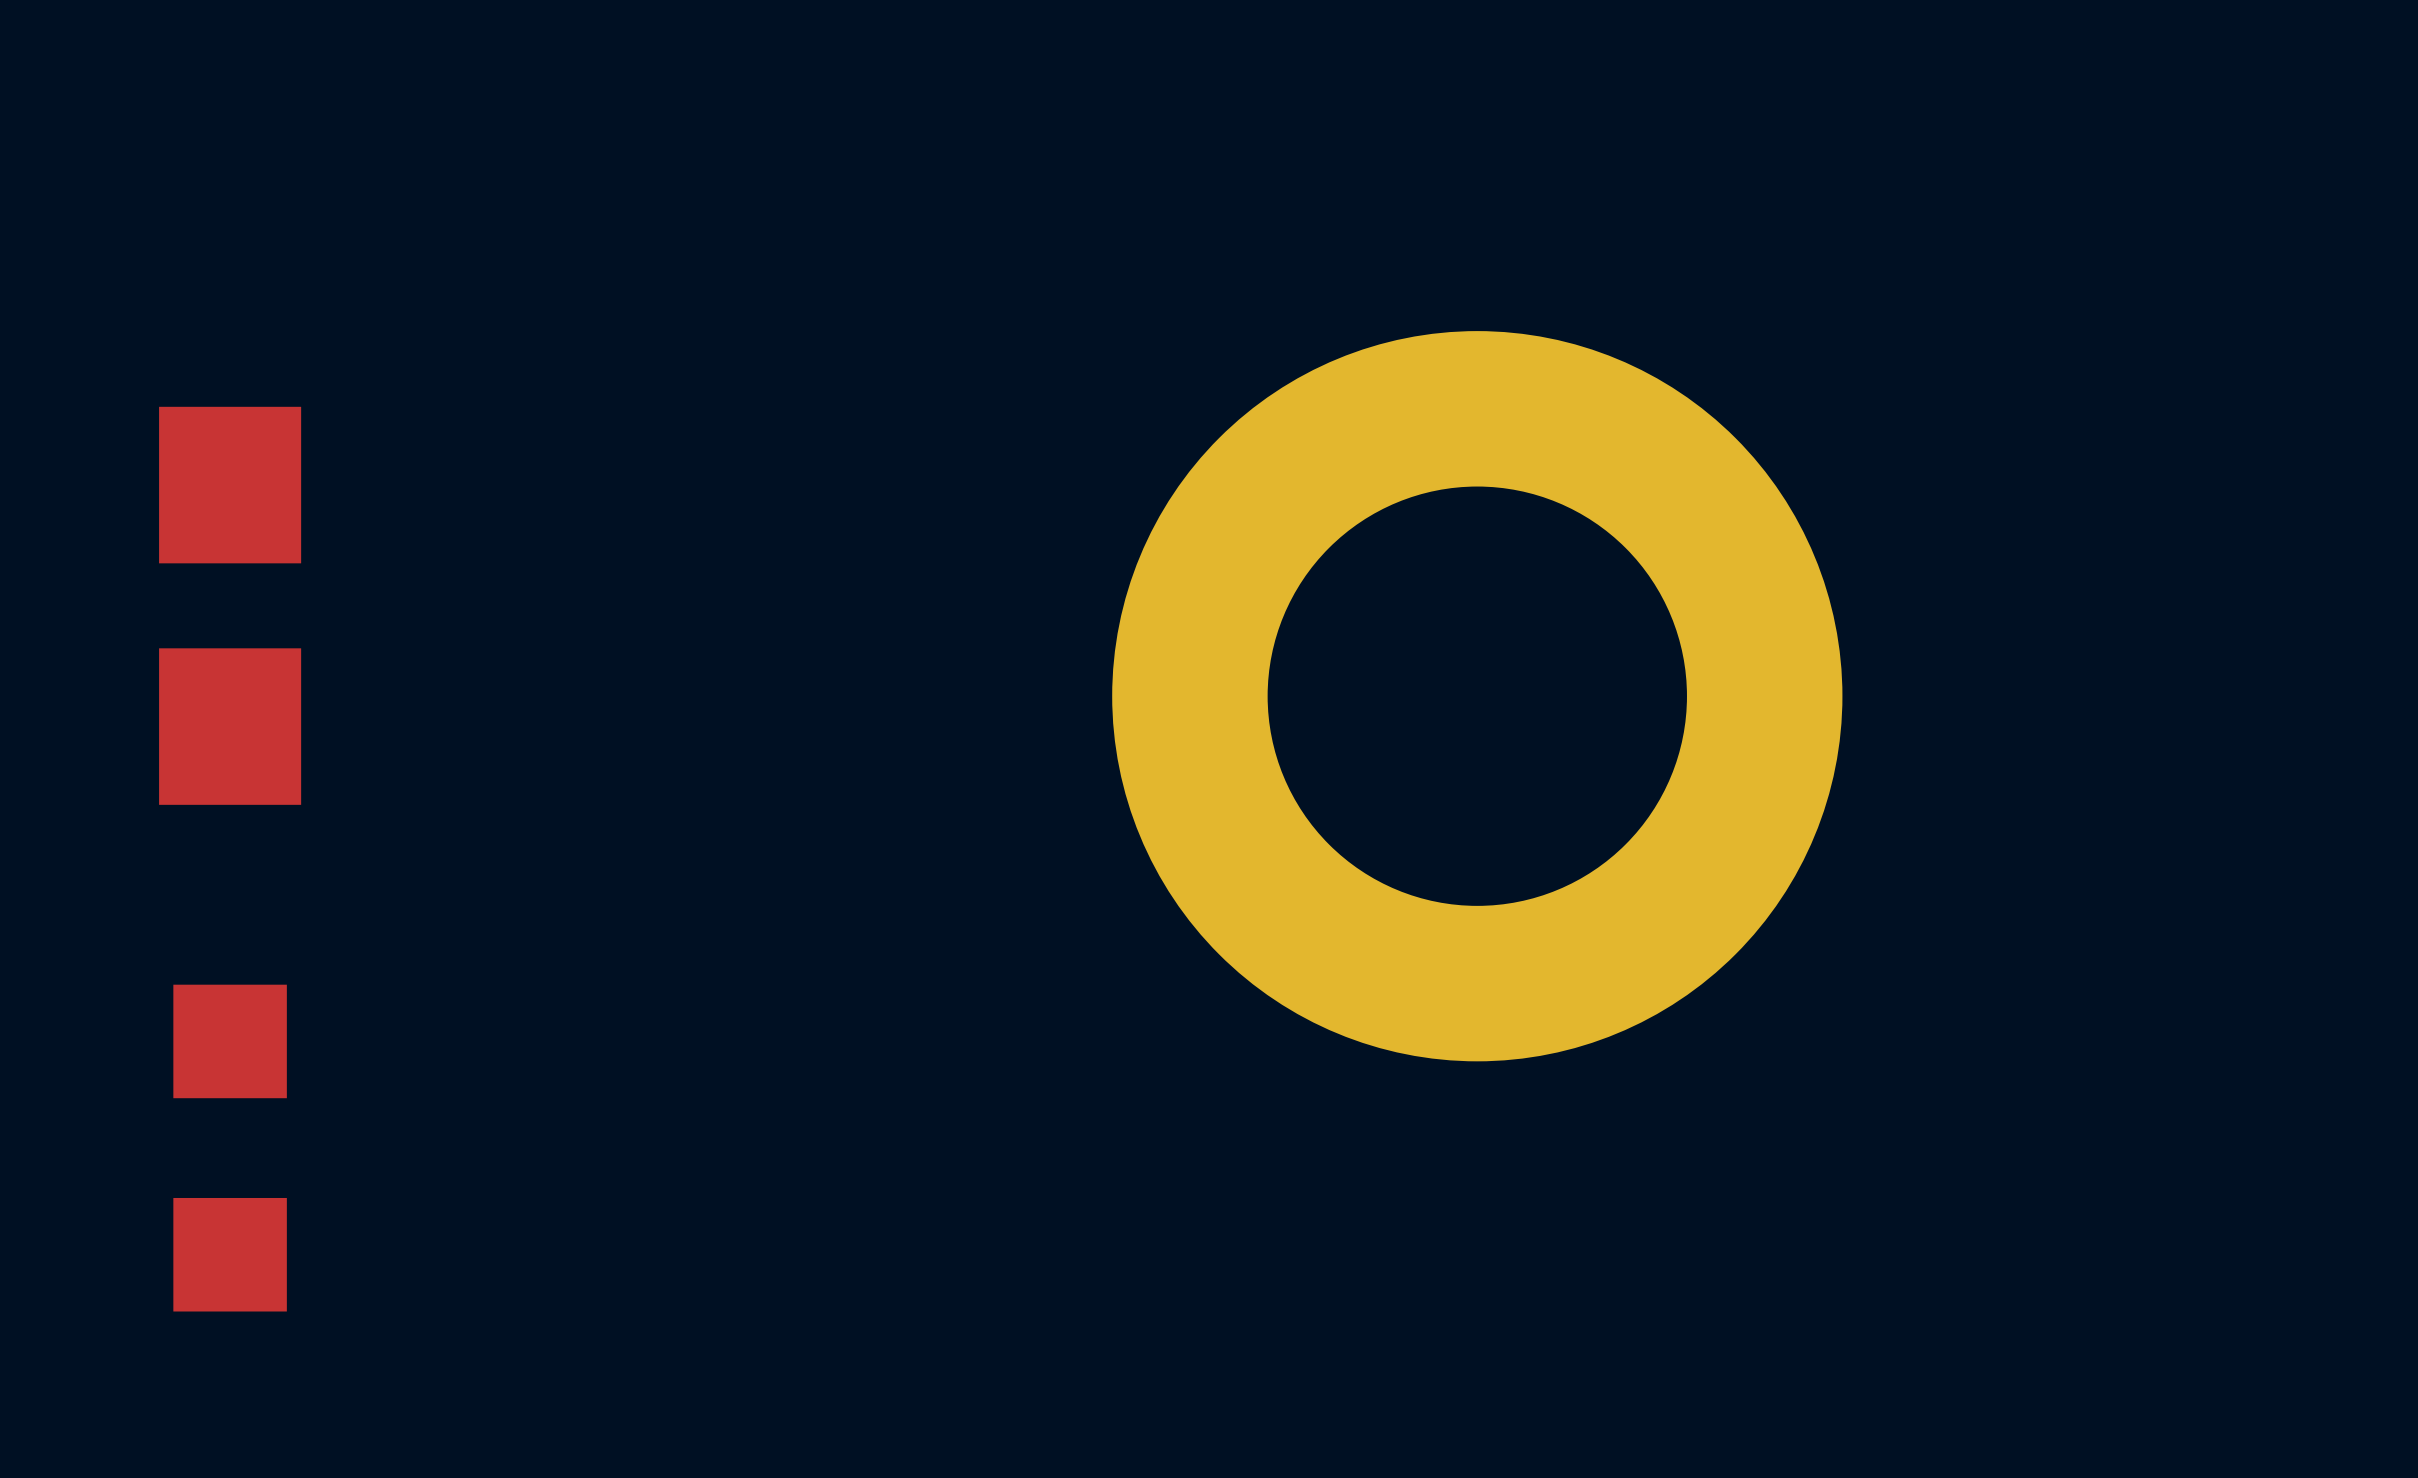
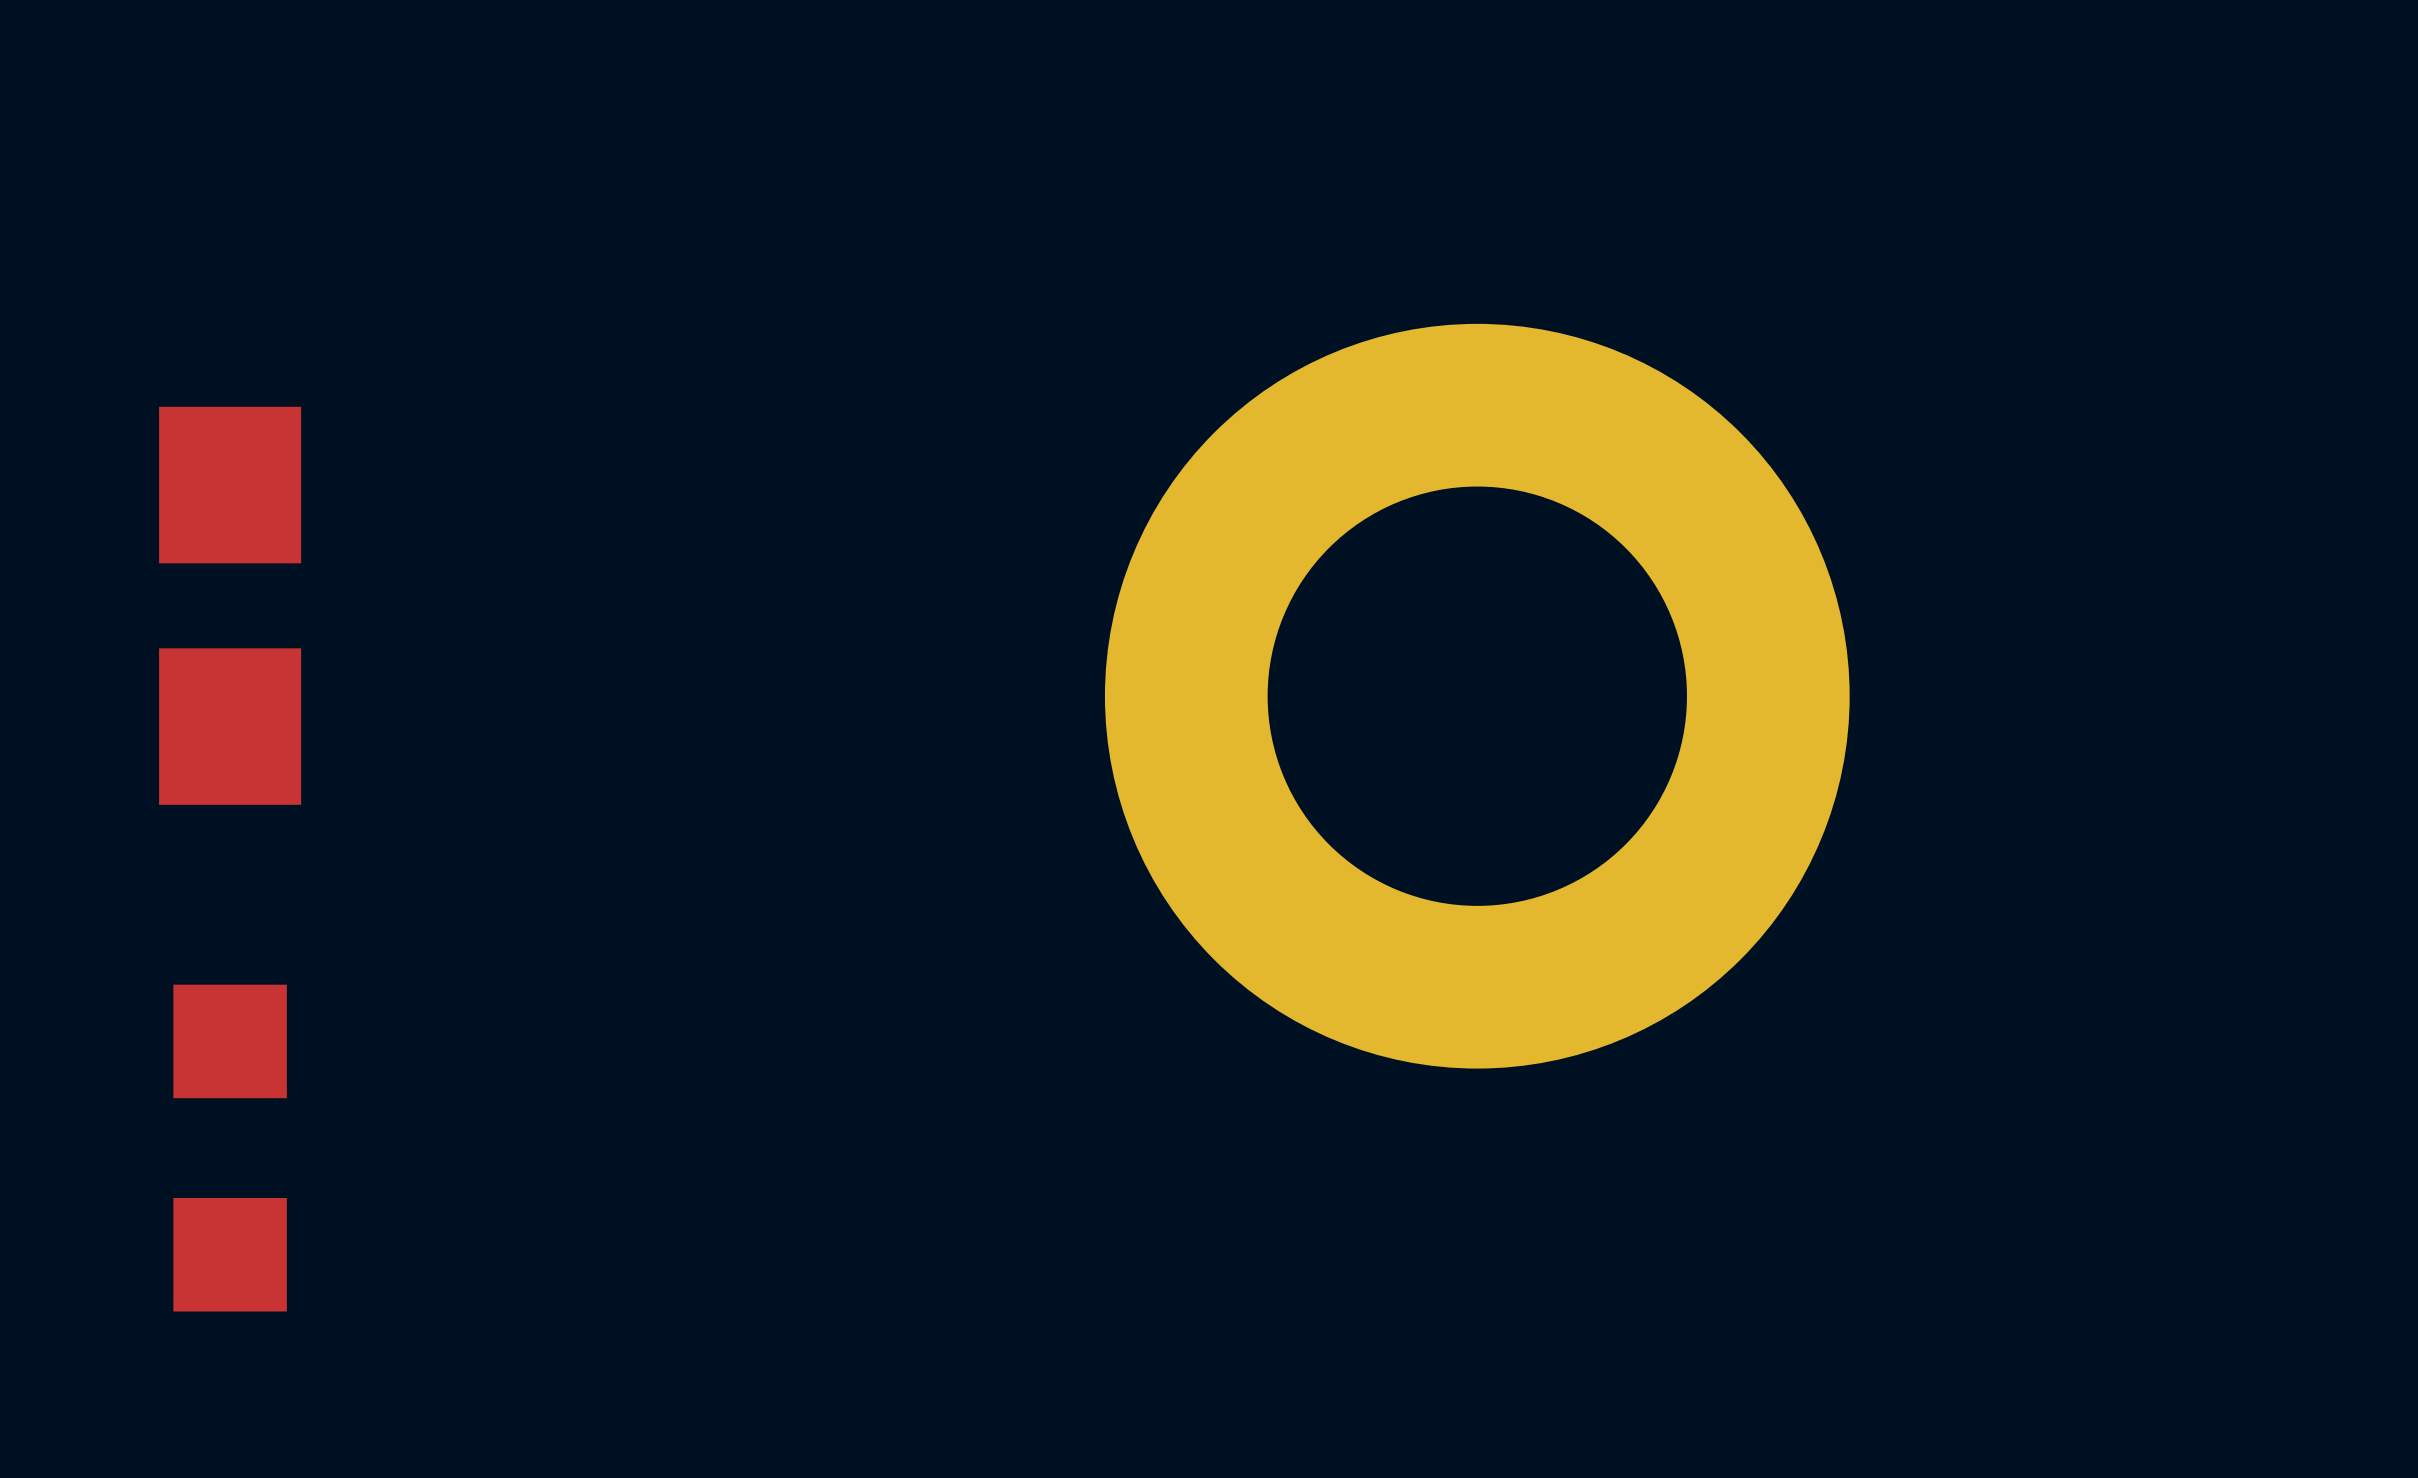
part footprint: [1112, 331, 1843, 1062] -> [1104, 323, 1850, 1069]

